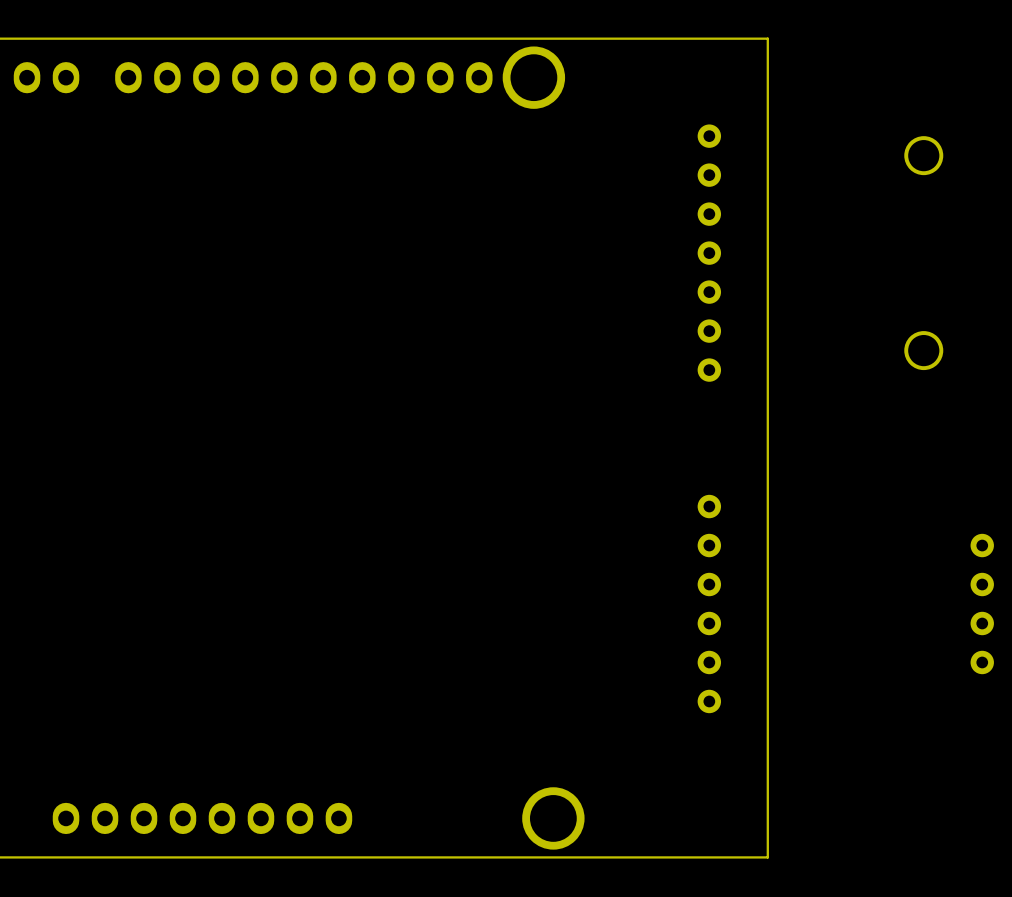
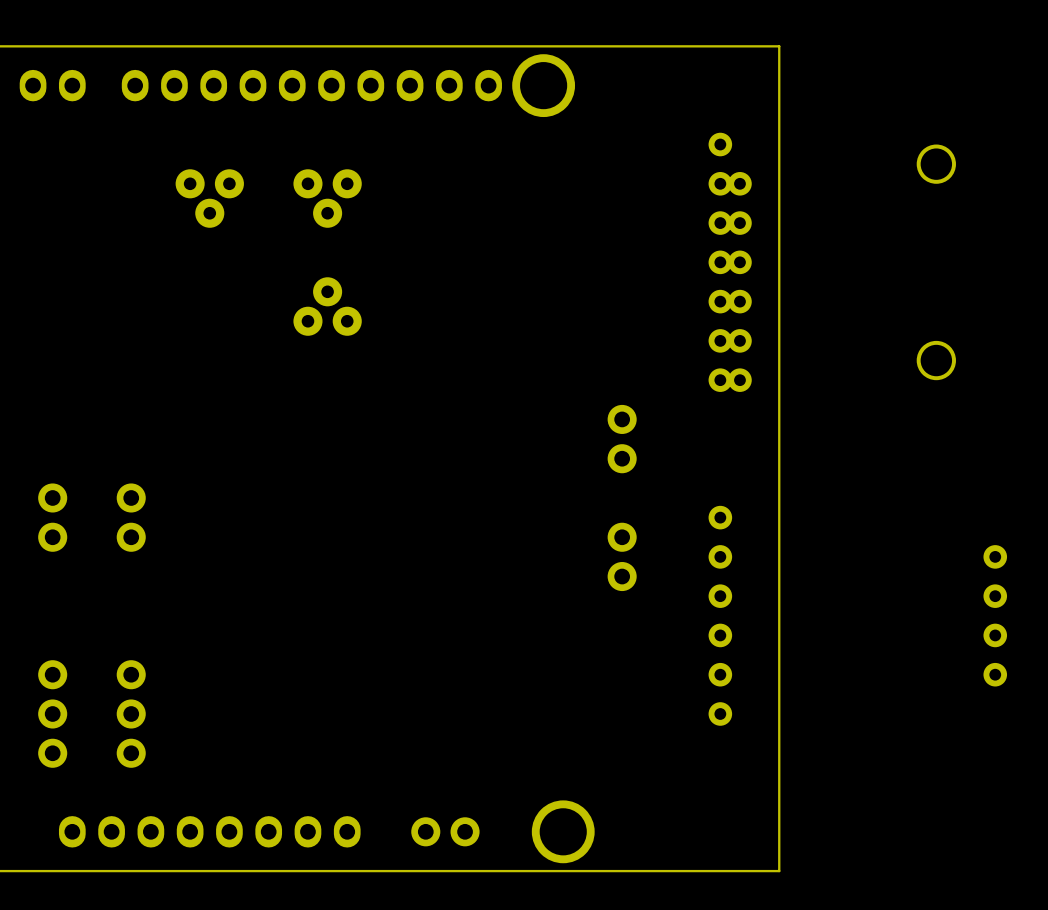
part: none -> (209, 198)
part: none -> (327, 198)
part: none -> (739, 281)
part: none -> (327, 306)
part: none -> (622, 439)
part: none -> (52, 517)
part: none -> (131, 517)
part: none -> (622, 556)
part: none -> (52, 713)
part: none -> (131, 713)
part: none -> (445, 831)

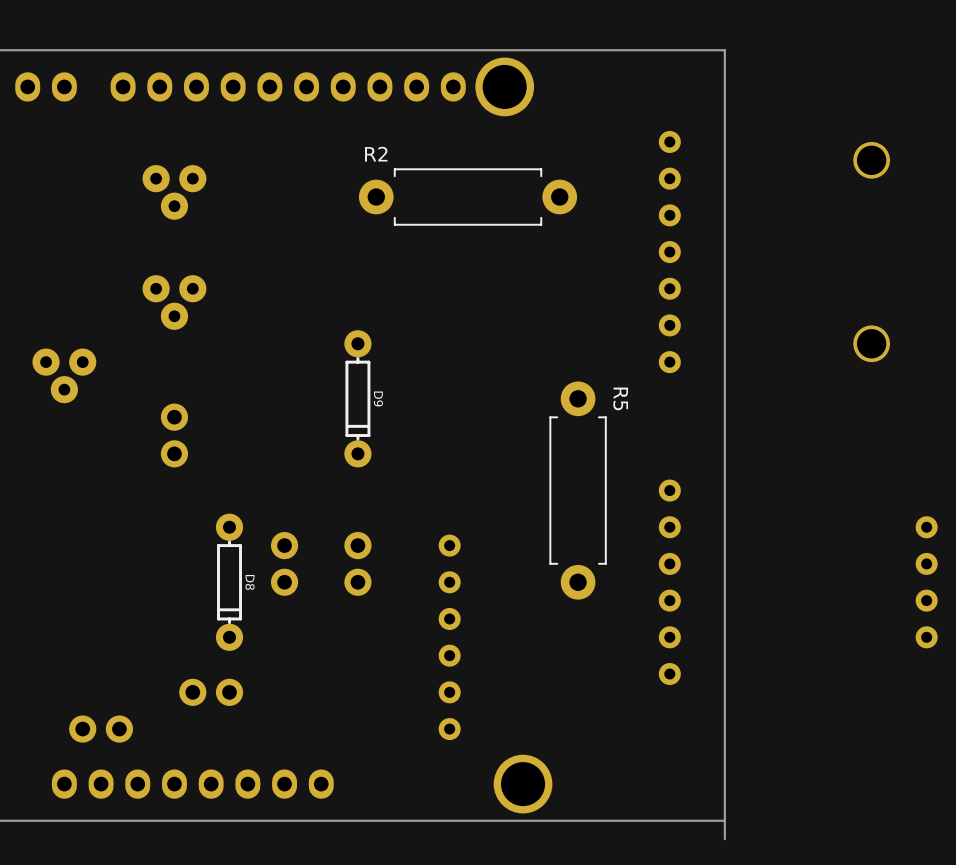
part position: (209, 198) -> (174, 192)
part: (327, 198) -> none
R2: none -> (468, 197)
part: (739, 281) -> none
part: (327, 306) -> none
part: none -> (174, 302)
part: none -> (64, 375)
D9: none -> (357, 398)
part: (622, 439) -> none
part: none -> (174, 435)
part: (52, 517) -> none
part: (131, 517) -> none
R5: none -> (578, 490)
part: (622, 556) -> none
part: none -> (284, 563)
part: none -> (357, 563)
D8: none -> (229, 582)
part: none -> (449, 637)
part: (52, 713) -> none
part: (131, 713) -> none
part: none -> (211, 692)
part: none -> (101, 729)
part: (445, 831) -> none
board edge: none -> (724, 820) (724, 839)

